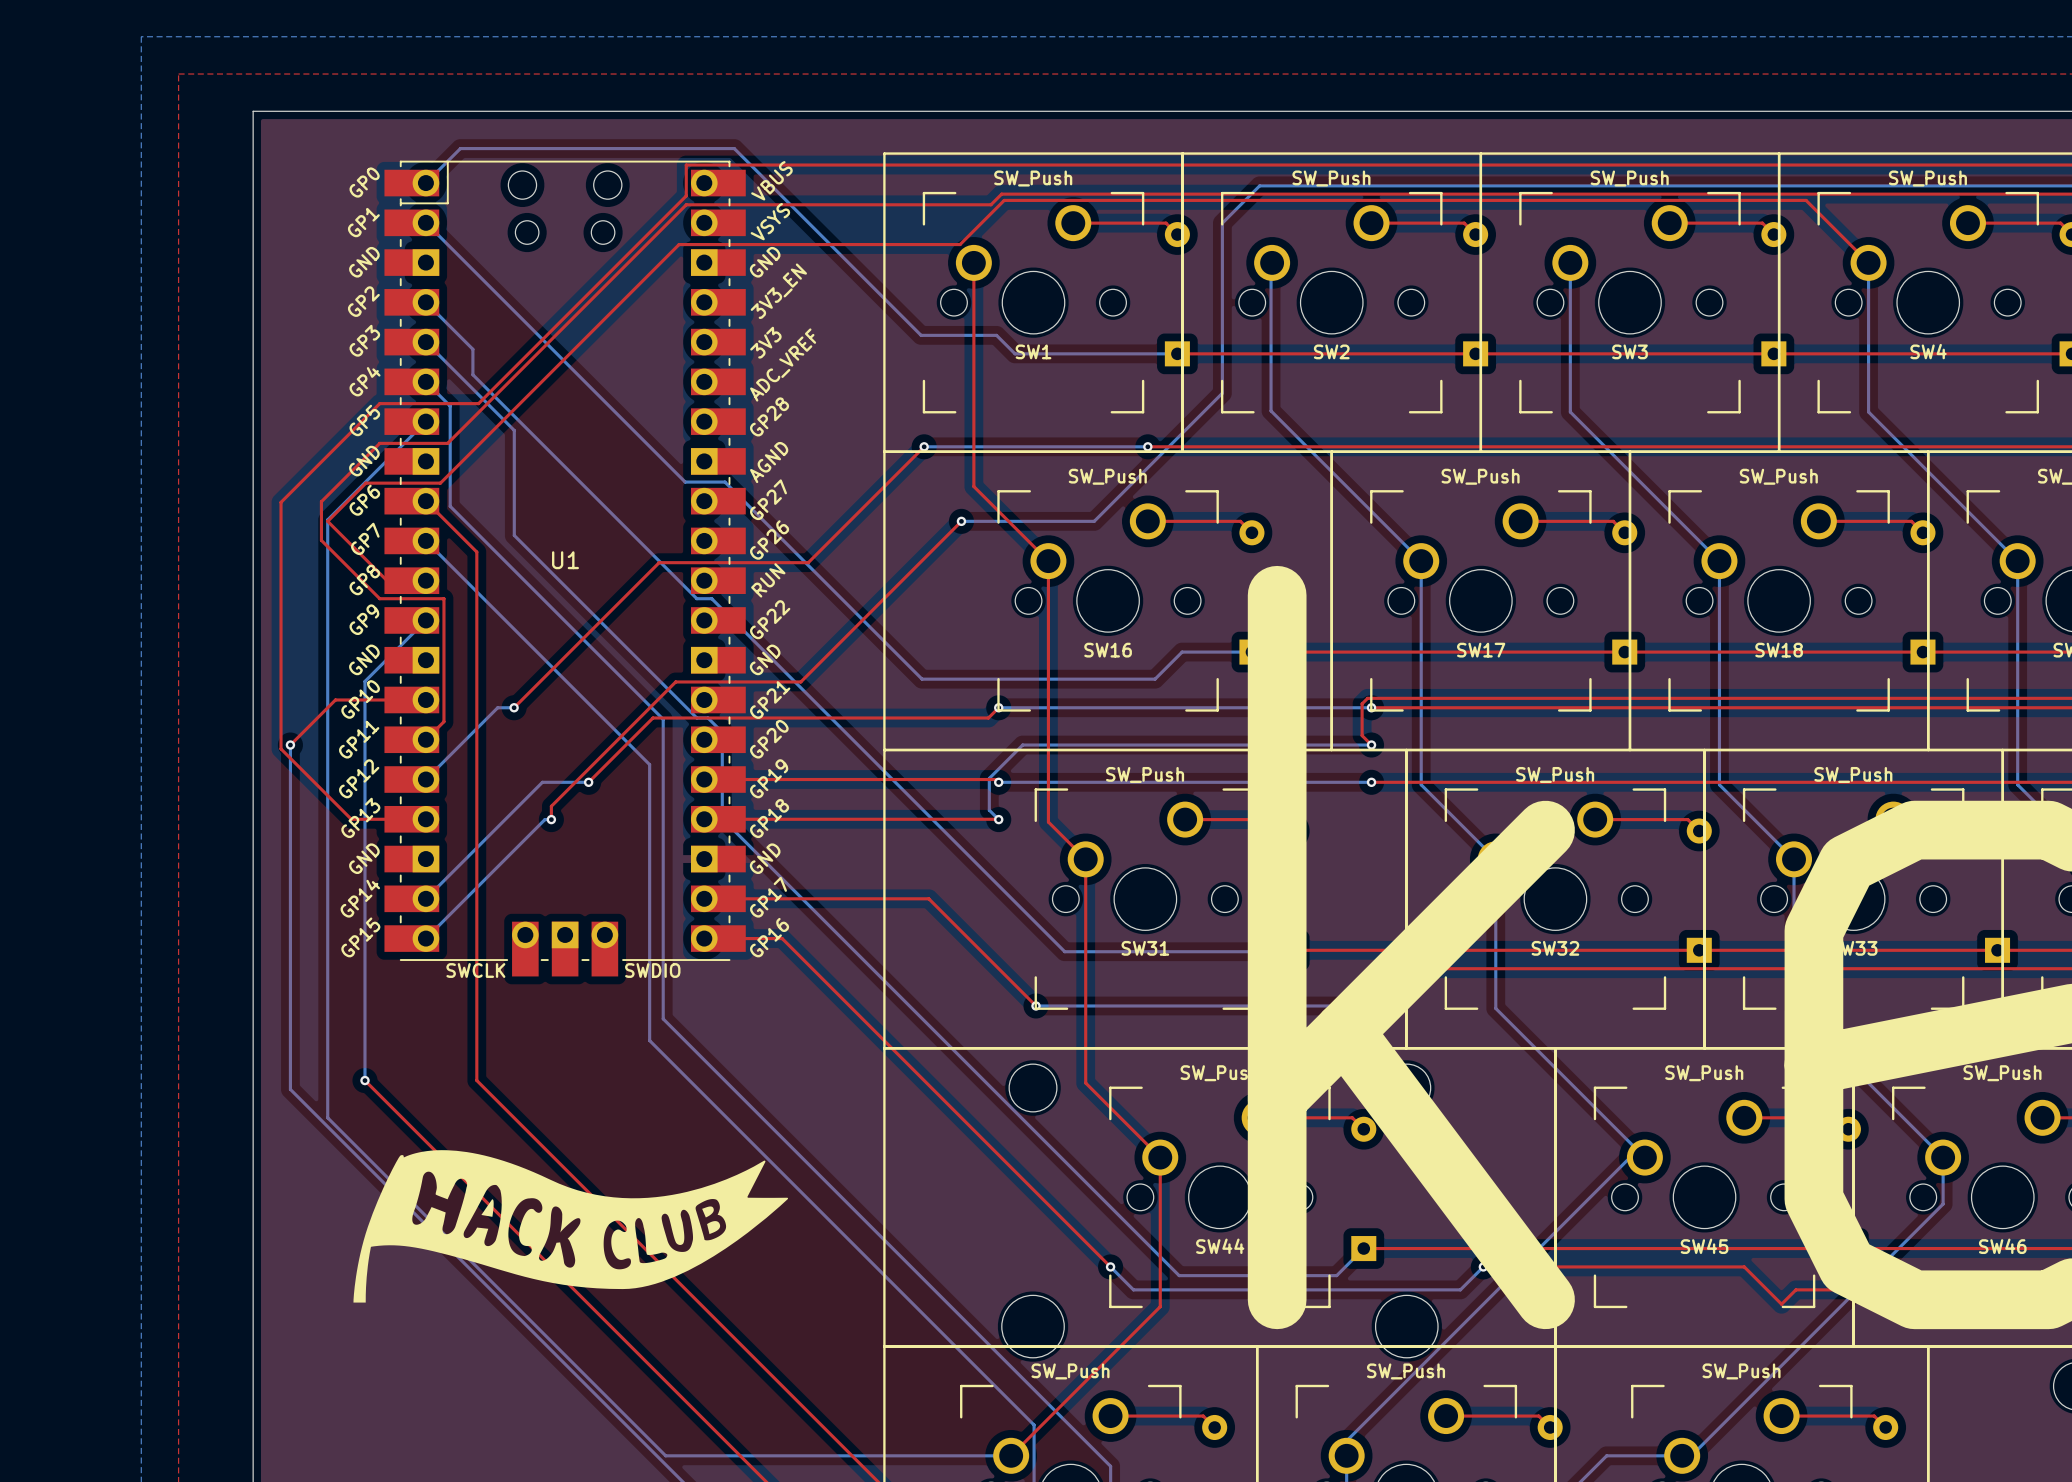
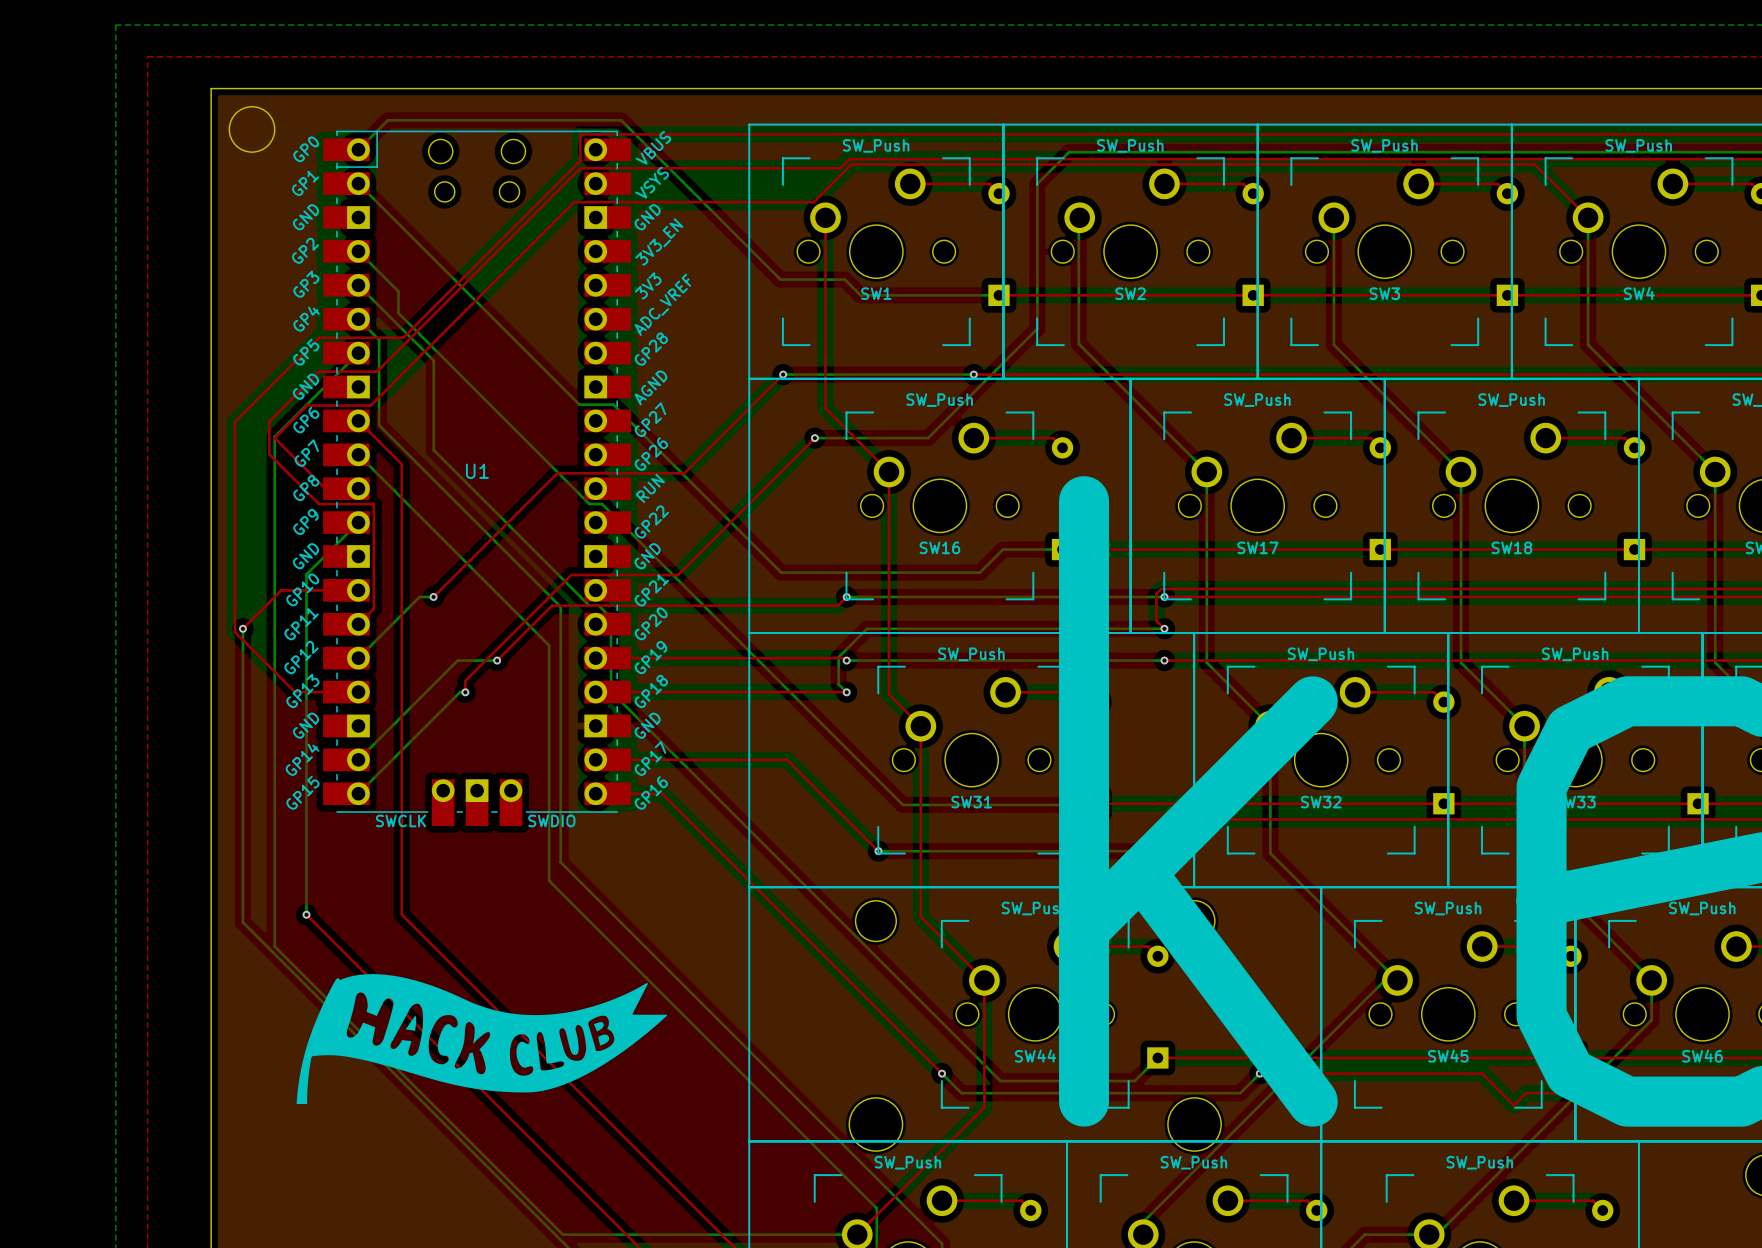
round board edge: none -> [229, 106, 276, 153]

